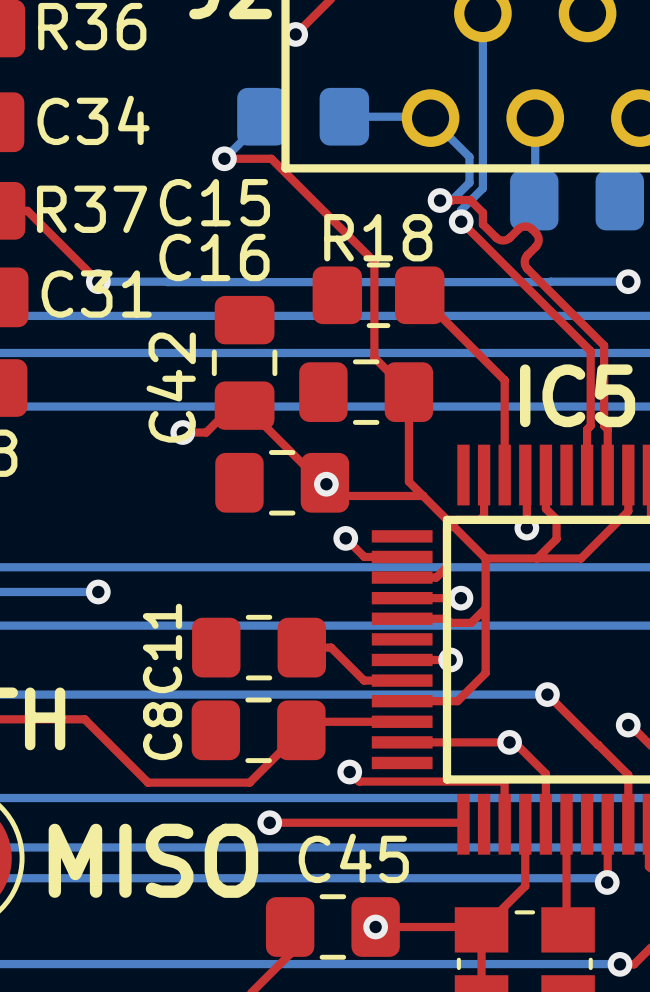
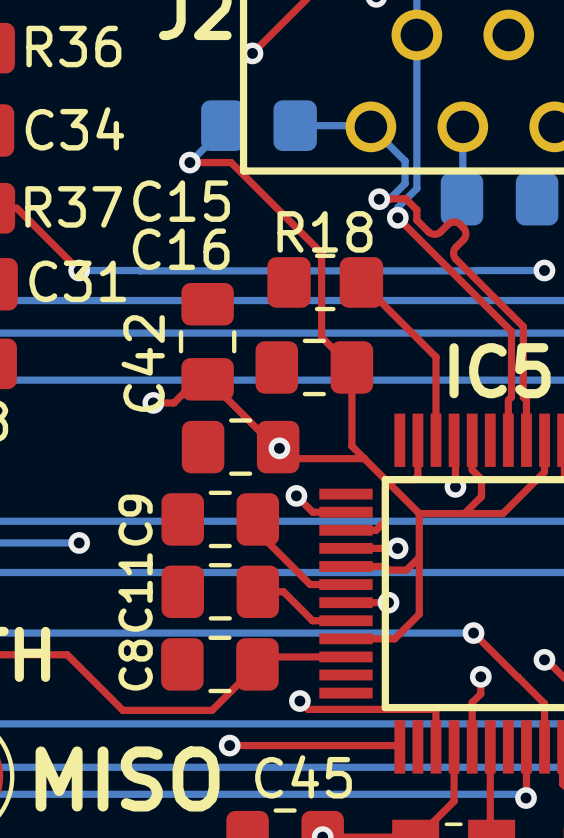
C9: none -> (220, 519)
top track: none -> (257, 532) (310, 584) (345, 584)
top track: (402, 742) (514, 742) (545, 773) -> (480, 676) (480, 693) (472, 702)
via position: (509, 742) -> (480, 676)

